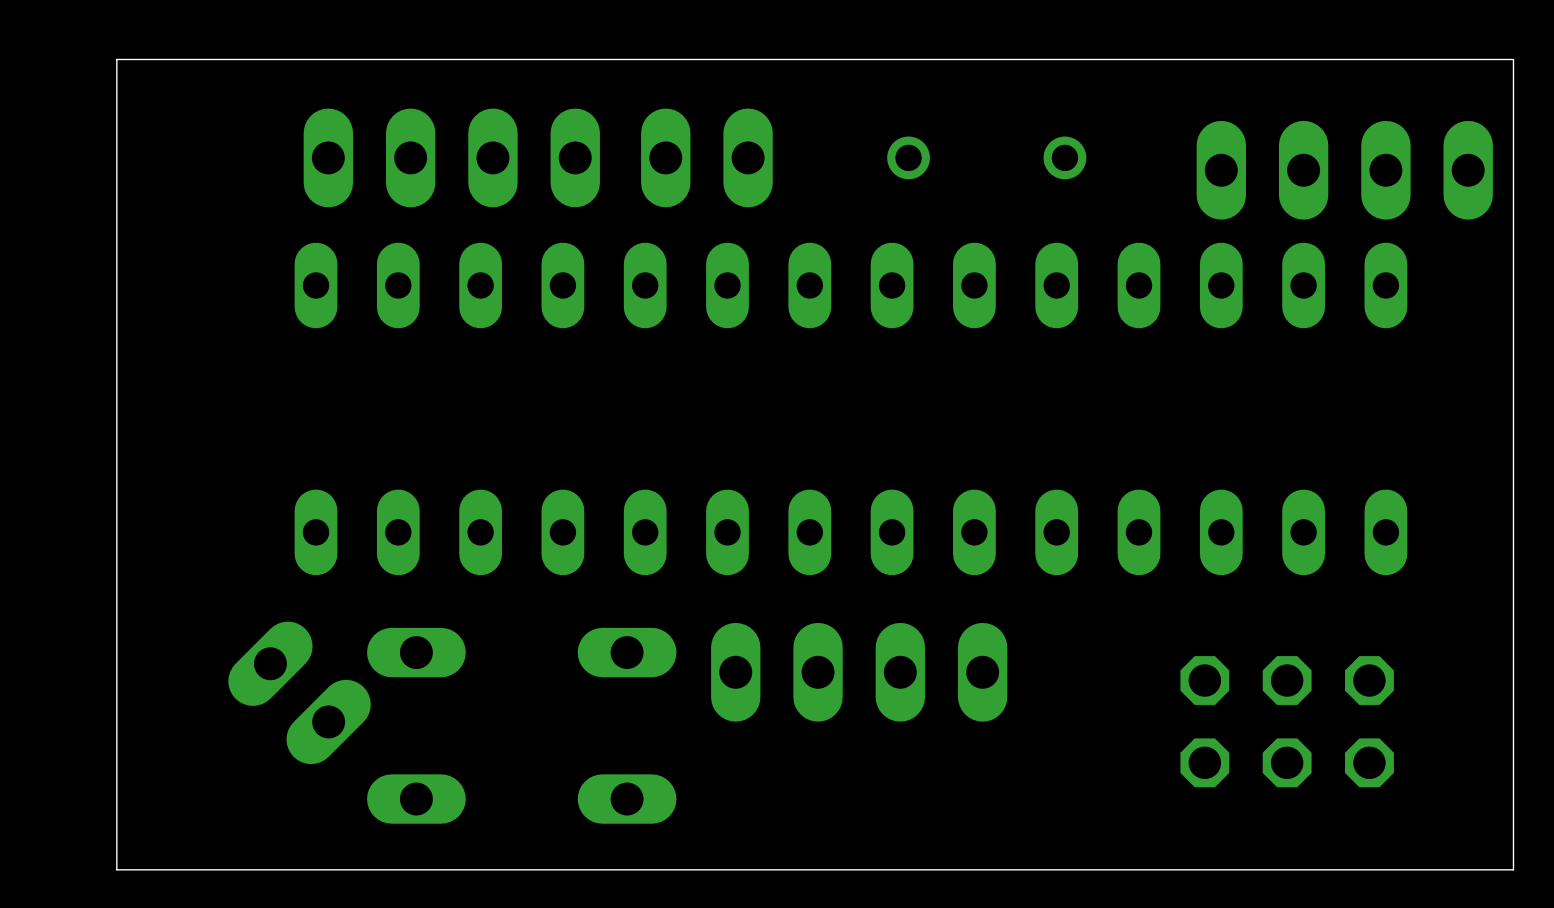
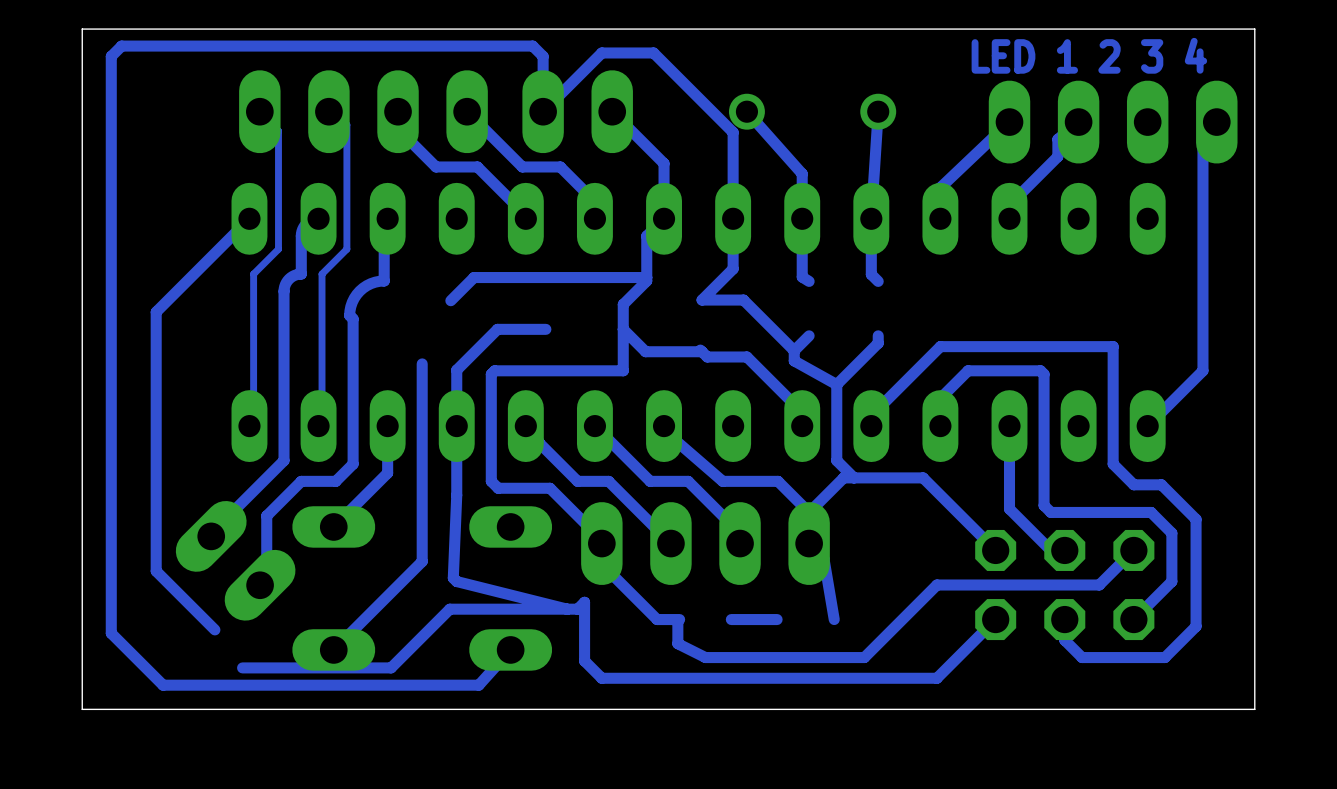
text: none -> LED 1 2 3 4 (1089, 55)
track: none -> (259, 111) (278, 131) (278, 249) (253, 274) (253, 423) (249, 426)
track: none -> (328, 111) (334, 112) (346, 124) (346, 249) (322, 274) (322, 423) (318, 426)
track: none -> (398, 111) (398, 128) (436, 166) (477, 166) (525, 215) (525, 218)
track: none -> (467, 111) (522, 166) (560, 166) (594, 201) (594, 218)
track: none -> (612, 111) (664, 163) (664, 218) (646, 236) (646, 280) (623, 304) (623, 370) (494, 370) (491, 374) (491, 481) (498, 488) (550, 488) (598, 536) (601, 543) (601, 564) (657, 619) (679, 619)
track: none -> (746, 111) (802, 173) (802, 277) (809, 281)
track: none -> (878, 111) (871, 218) (871, 274) (878, 281)
track: none -> (1009, 122) (940, 187) (940, 218)
track: none -> (1078, 122) (1057, 139) (1057, 156) (1009, 204) (1009, 218)
track: none -> (1216, 122) (1202, 135) (1202, 370) (1147, 426)
track: none -> (249, 218) (156, 312) (156, 571) (214, 629)
track: none -> (318, 218) (308, 222) (302, 229) (301, 274) (290, 277) (284, 289) (284, 460) (211, 533) (211, 536)
track: none -> (387, 218) (384, 222) (384, 280) (370, 283) (359, 291) (354, 298) (349, 311) (349, 315) (353, 318) (353, 464) (335, 481) (301, 481) (266, 515) (266, 578) (260, 585)
track: none -> (646, 277) (474, 277) (450, 300)
track: none -> (545, 329) (497, 329) (456, 370) (456, 495) (453, 578) (456, 581) (567, 609)
track: none -> (623, 329) (645, 351) (702, 351)
track: none -> (809, 335) (794, 350)
track: none -> (878, 335) (878, 343) (836, 384)
track: none -> (700, 350) (707, 356) (746, 356) (802, 412) (802, 426)
track: none -> (794, 350) (794, 360) (836, 384)
track: none -> (794, 350) (743, 300) (702, 300) (733, 268) (733, 132) (653, 52) (601, 52) (543, 111) (543, 56) (532, 46) (121, 46) (111, 56) (111, 633) (163, 685) (478, 685) (510, 649)
track: none -> (422, 363) (422, 561) (333, 649)
track: none -> (836, 384) (836, 460) (854, 477)
track: none -> (387, 426) (387, 473) (333, 526)
track: none -> (525, 426) (536, 436) (539, 443) (577, 481) (608, 481) (670, 543)
track: none -> (594, 426) (650, 481) (688, 481) (740, 533) (740, 543)
track: none -> (664, 426) (670, 436) (722, 481) (778, 481) (809, 512)
track: none -> (871, 426) (871, 415) (940, 346) (1113, 346) (1113, 464) (1133, 484) (1161, 484) (1196, 519) (1196, 626) (1164, 657) (1082, 657) (1064, 640) (1064, 619)
track: none -> (940, 426) (940, 398) (968, 370) (1040, 370) (1044, 374) (1044, 505) (1050, 512) (1151, 512) (1171, 533) (1171, 581) (1133, 619)
track: none -> (1009, 426) (1009, 509) (1050, 550) (1064, 550)
track: none -> (809, 512) (809, 543) (823, 558) (834, 619)
track: none -> (809, 512) (843, 477) (923, 477) (995, 550)
track: none -> (1133, 550) (1099, 585) (936, 585) (864, 657) (705, 657) (677, 643) (677, 621)
track: none -> (777, 619) (731, 619)
track: none -> (995, 619) (936, 678) (601, 678) (584, 661) (584, 602) (577, 609) (449, 609) (391, 667) (242, 667)

